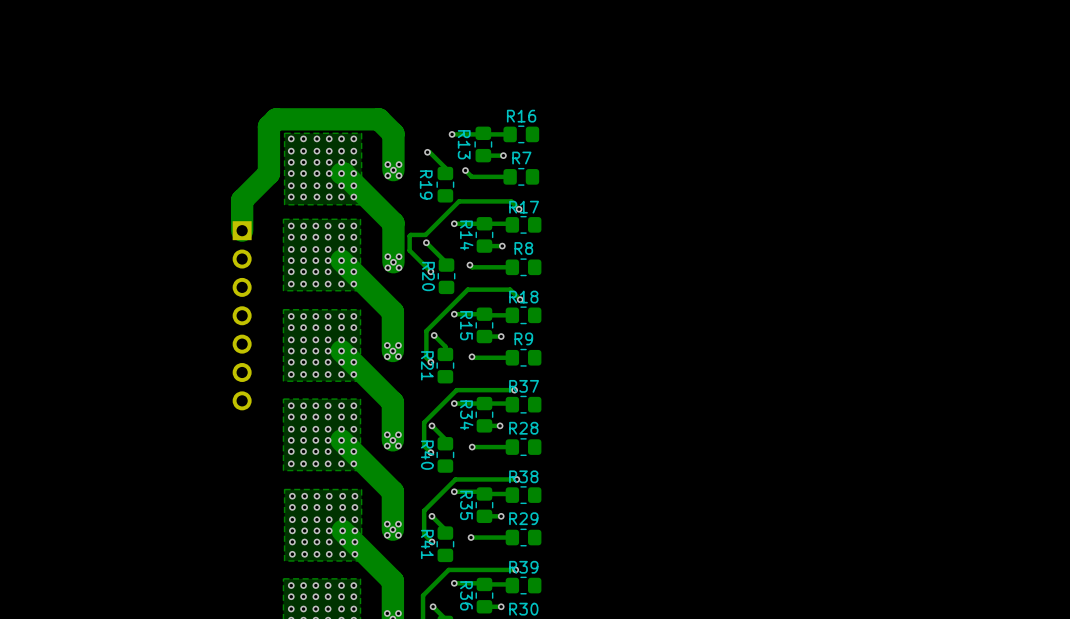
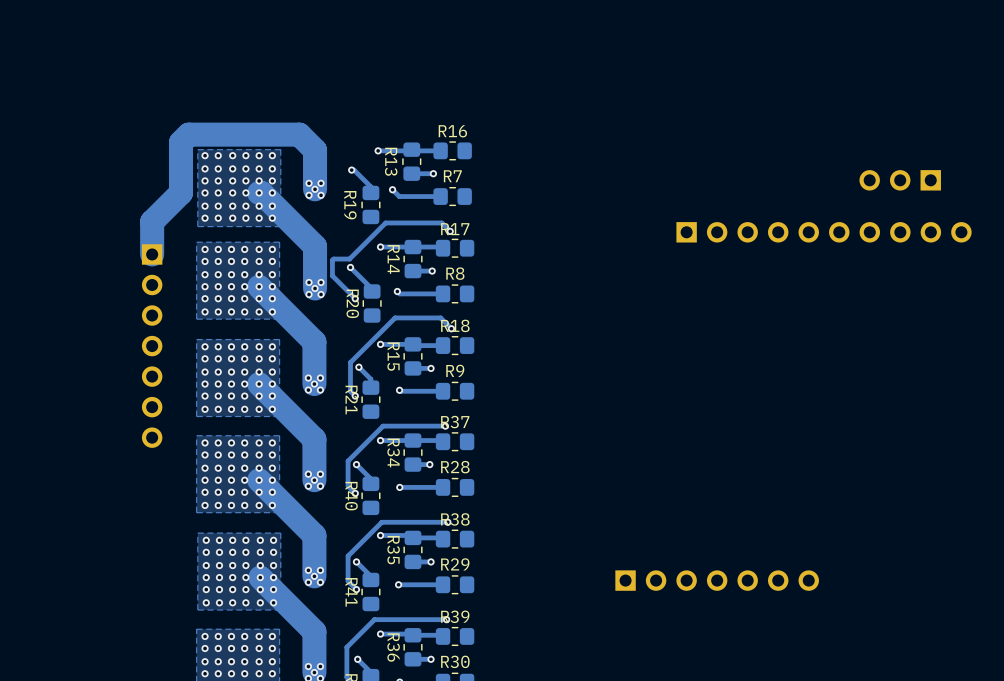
part: none -> (900, 180)
part: none -> (824, 232)
part: none -> (717, 580)

